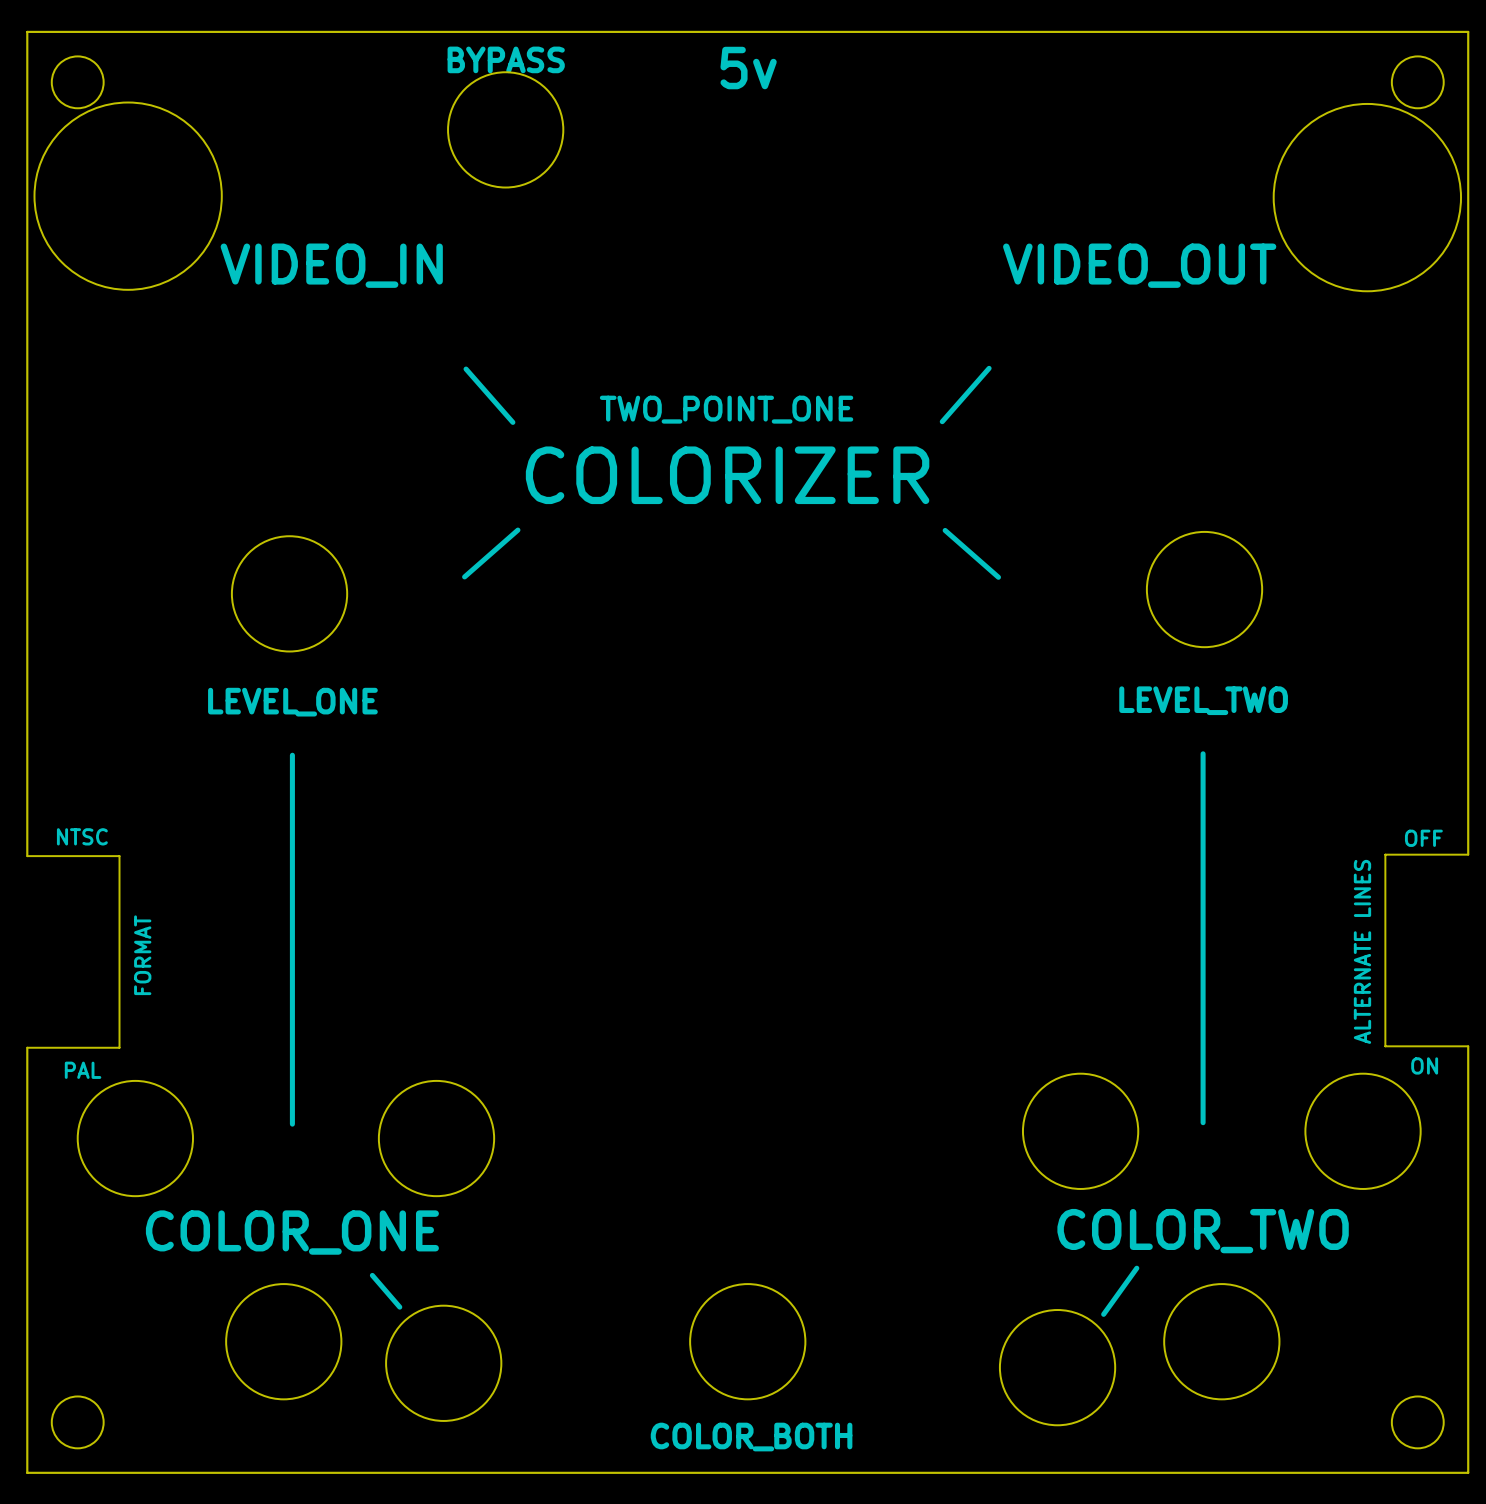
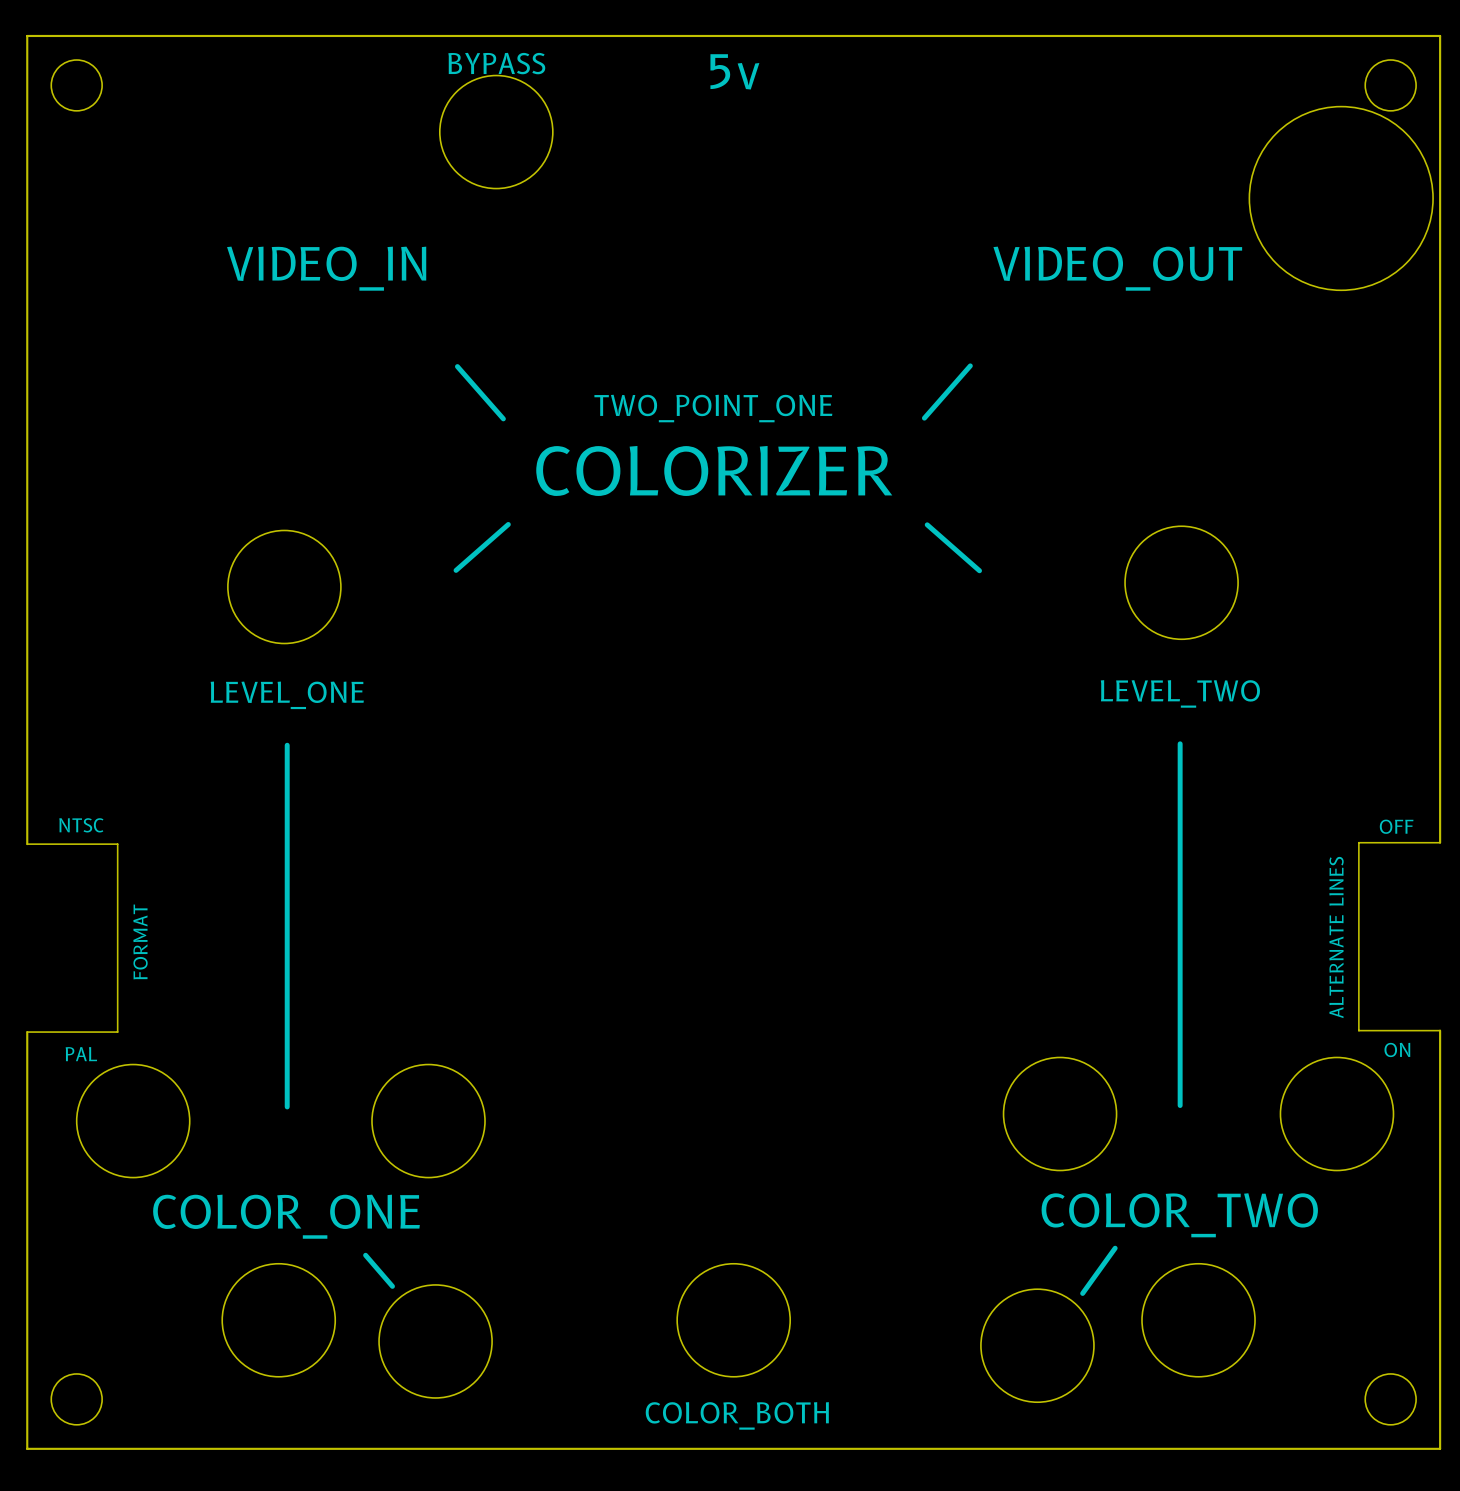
round board edge: [33, 101, 223, 291] -> none

